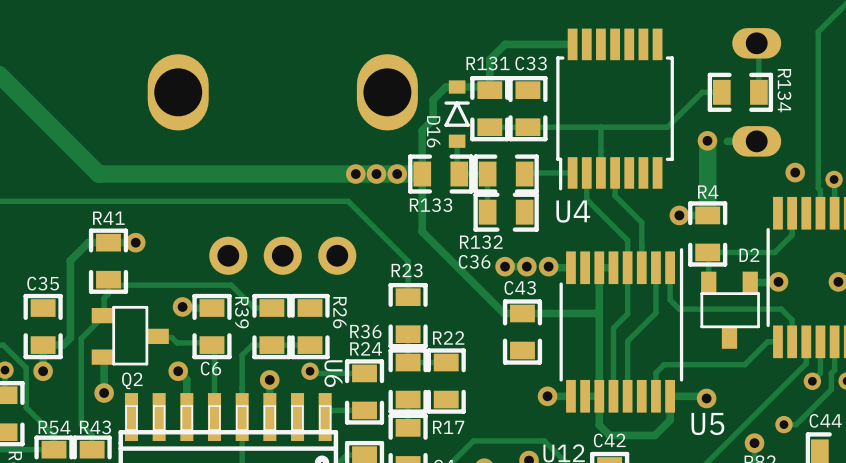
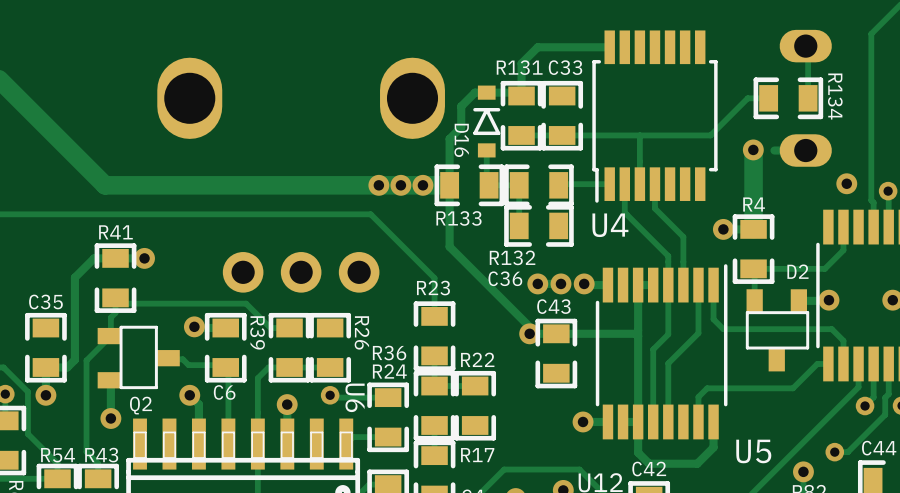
via: none -> (529, 333)
track: (670, 396) (704, 396) (706, 398) -> none
via: (706, 398) -> none

